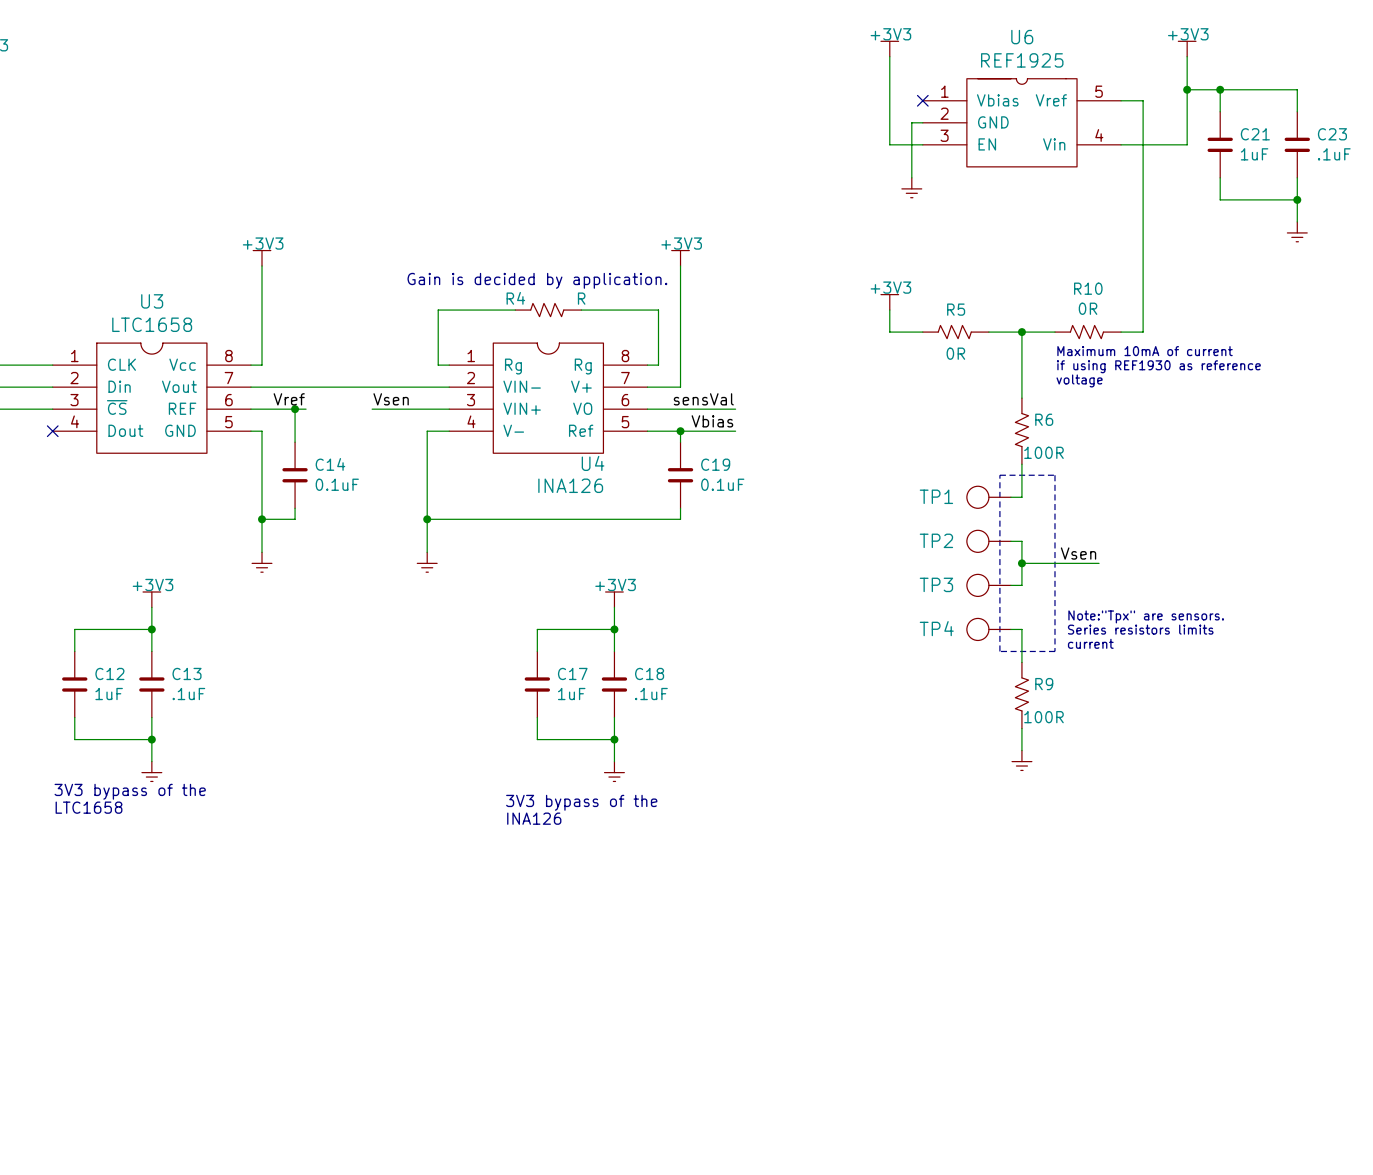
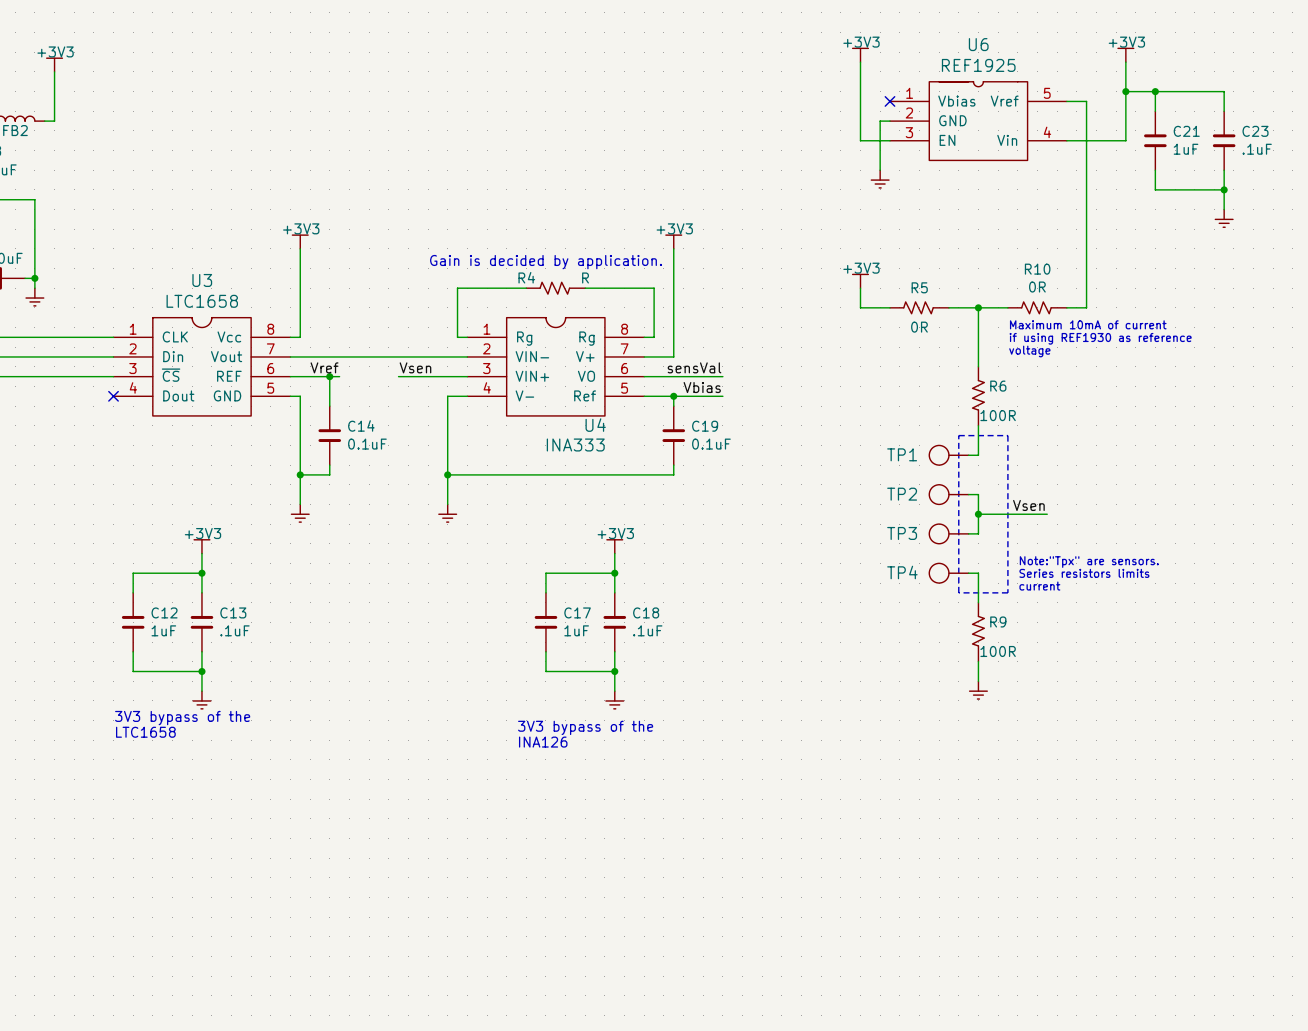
U4 value: INA126 (570, 485) -> INA333 (575, 445)

